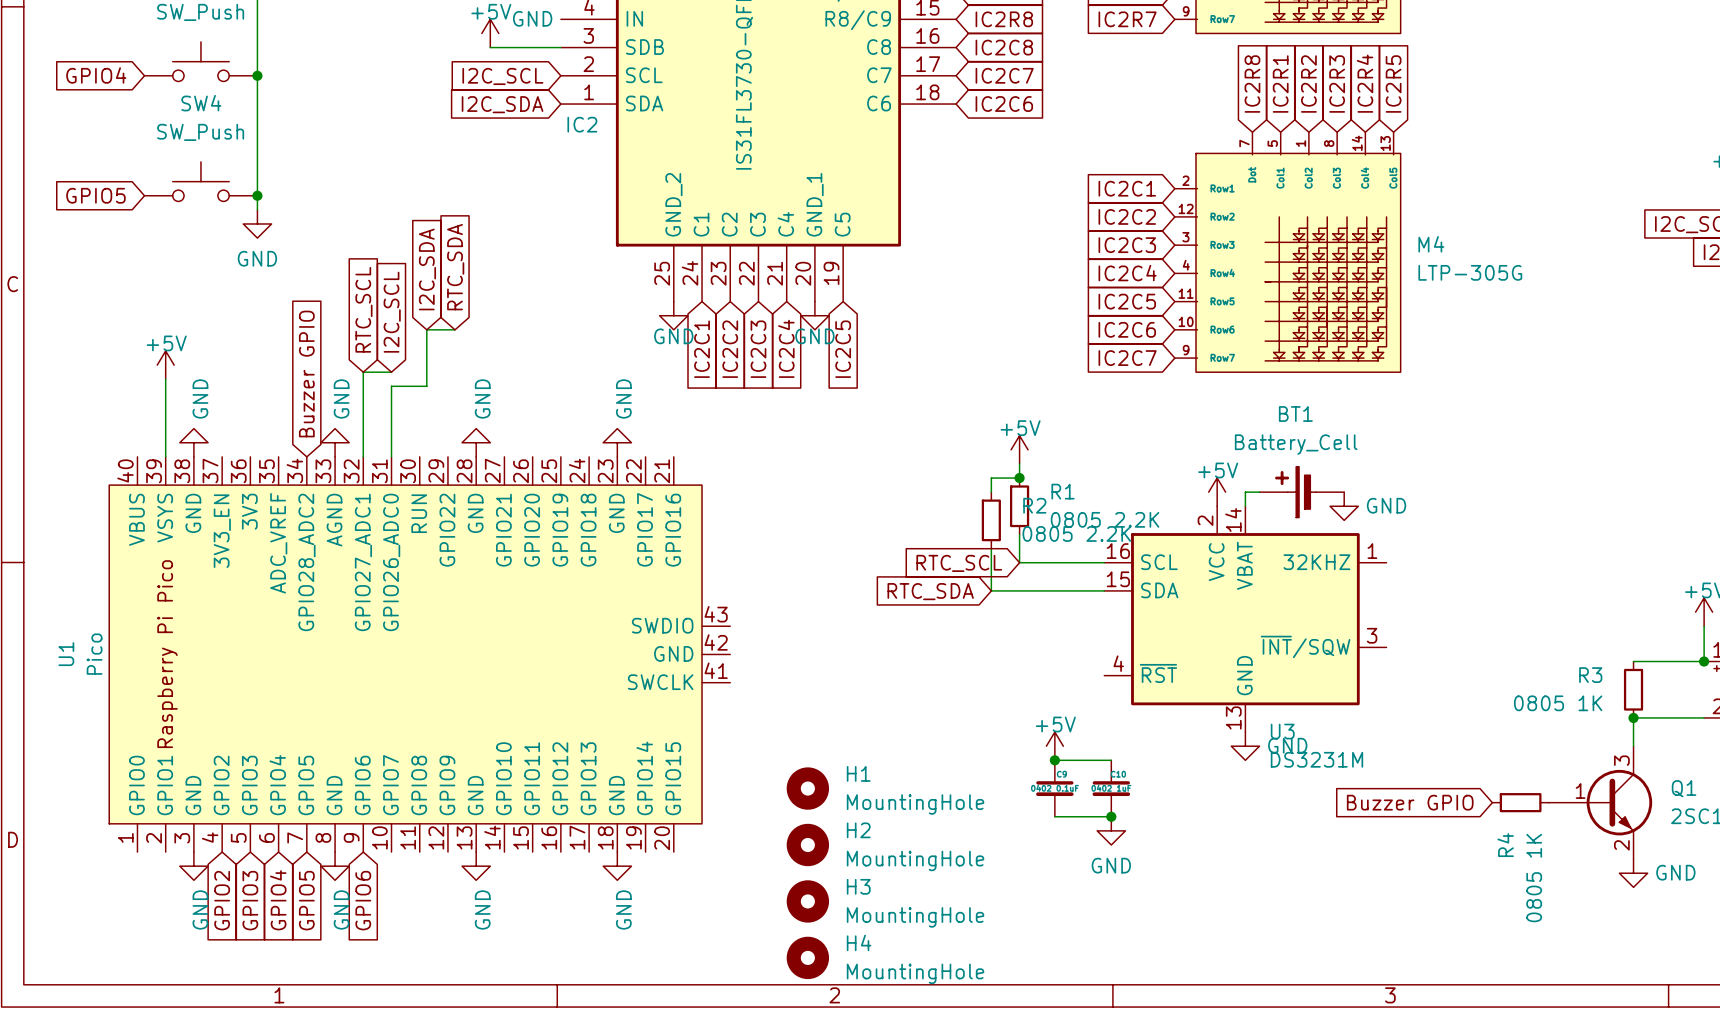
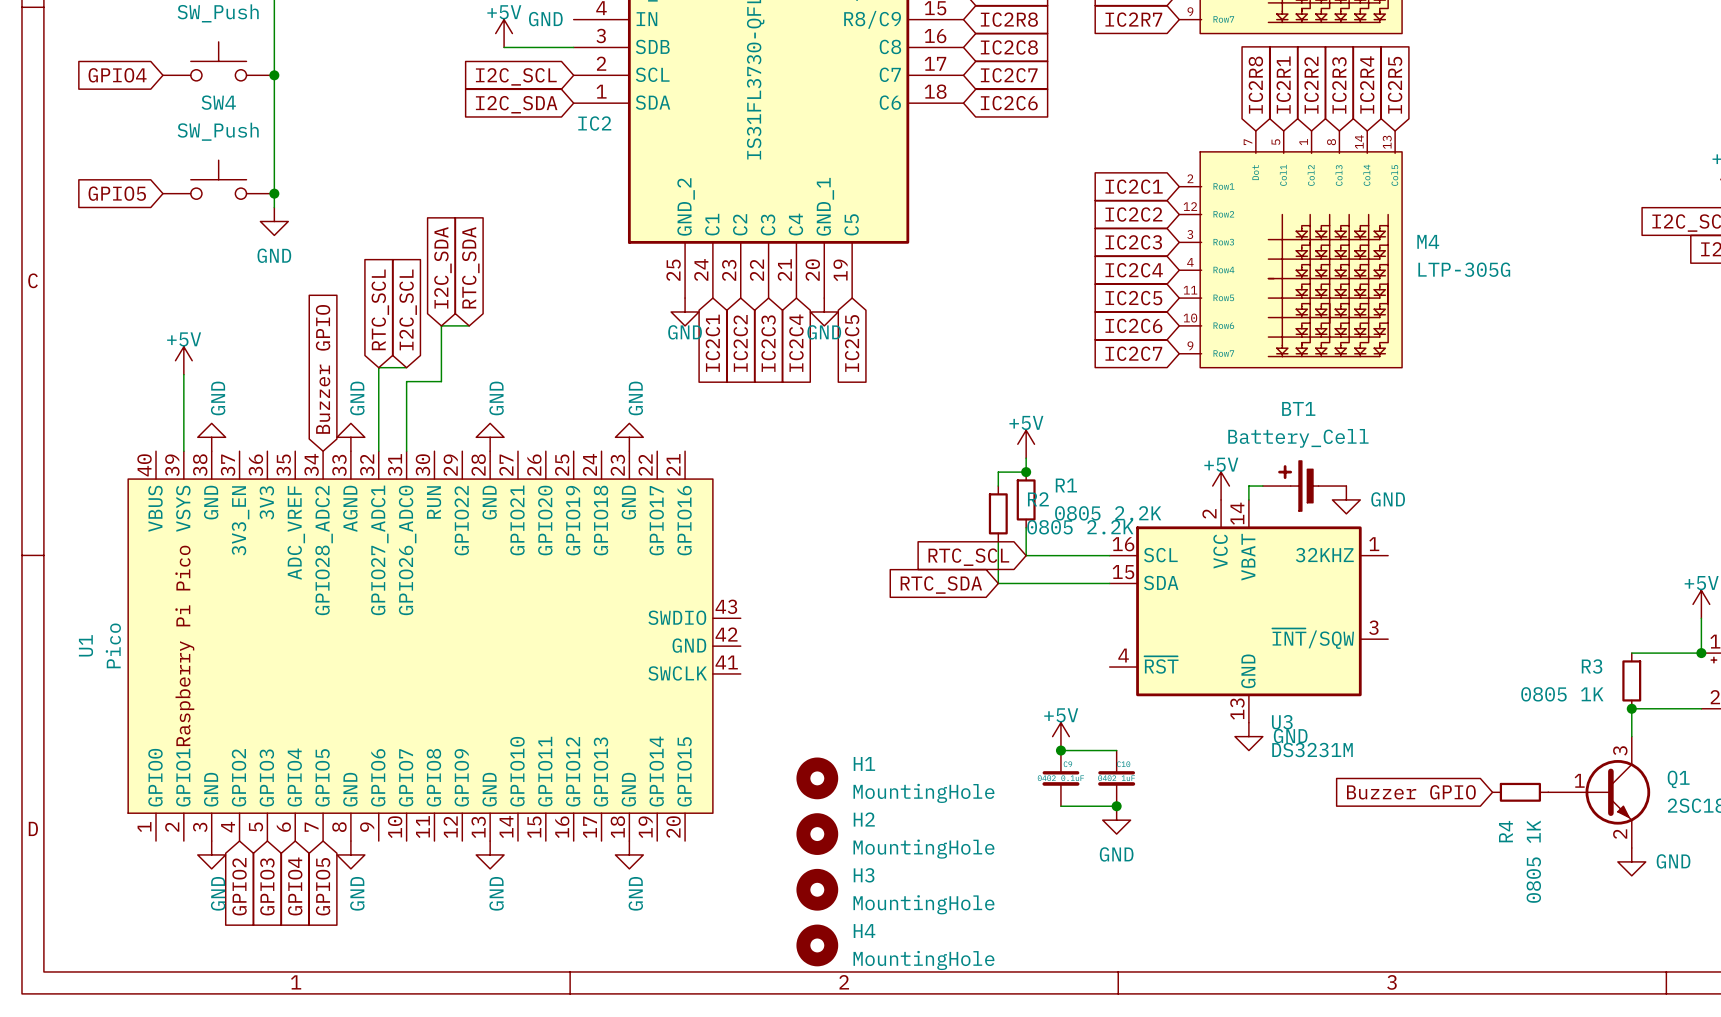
global label: GPIO6 (363, 900) -> none

